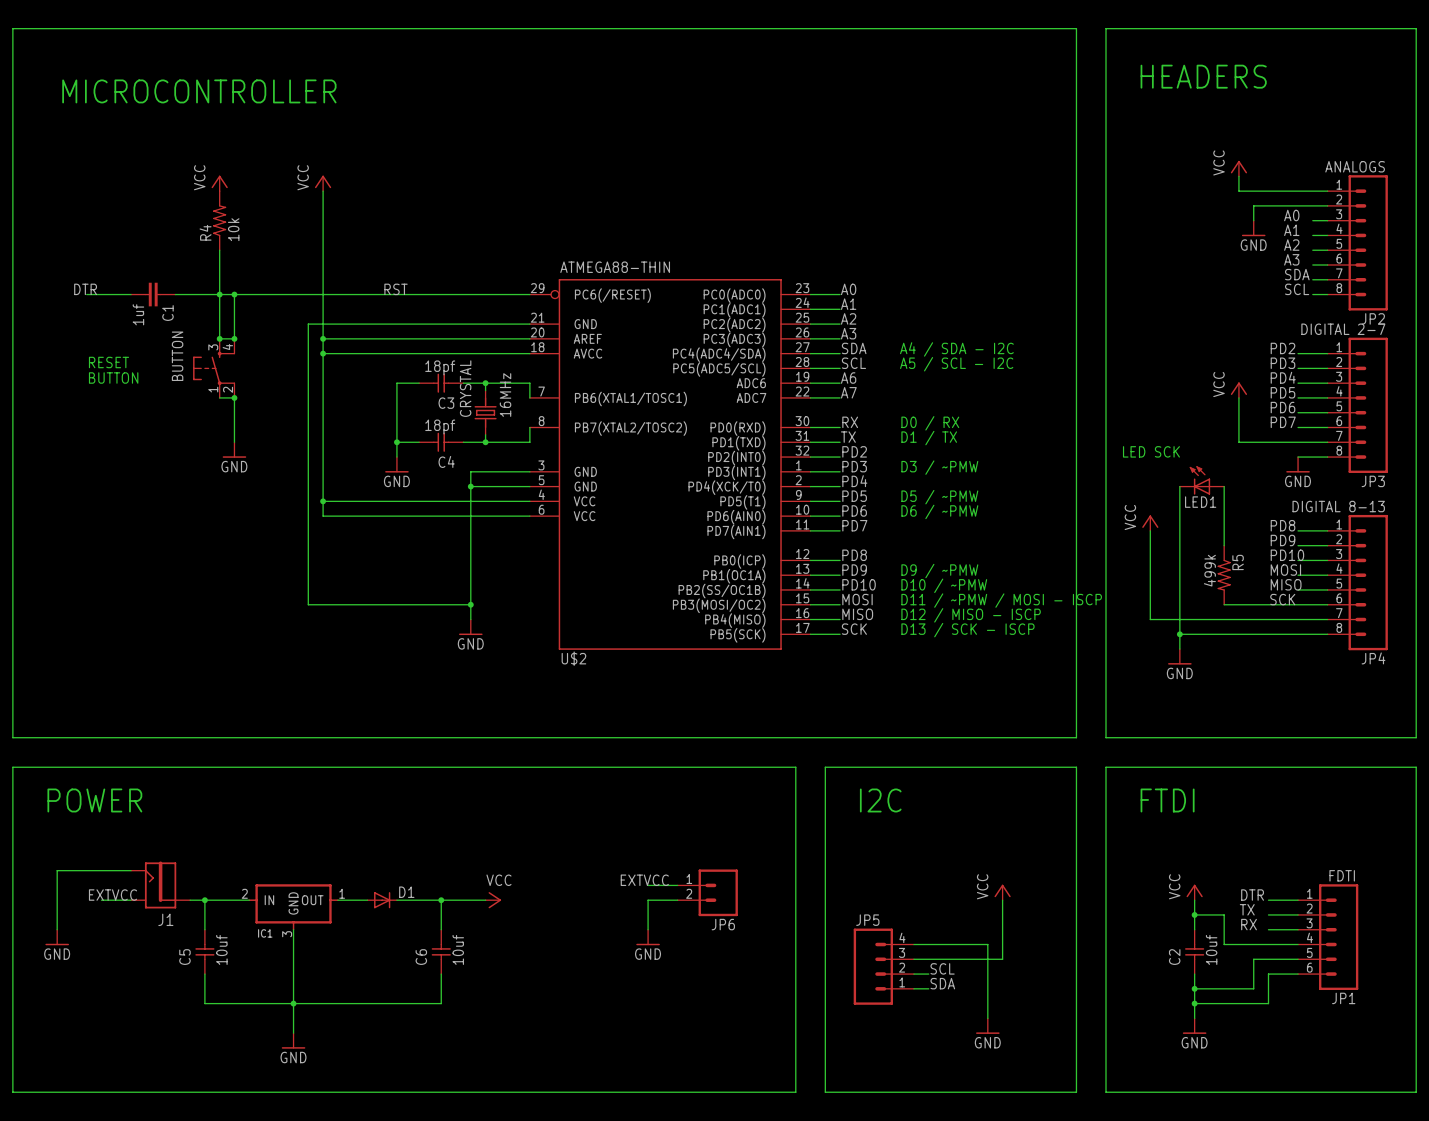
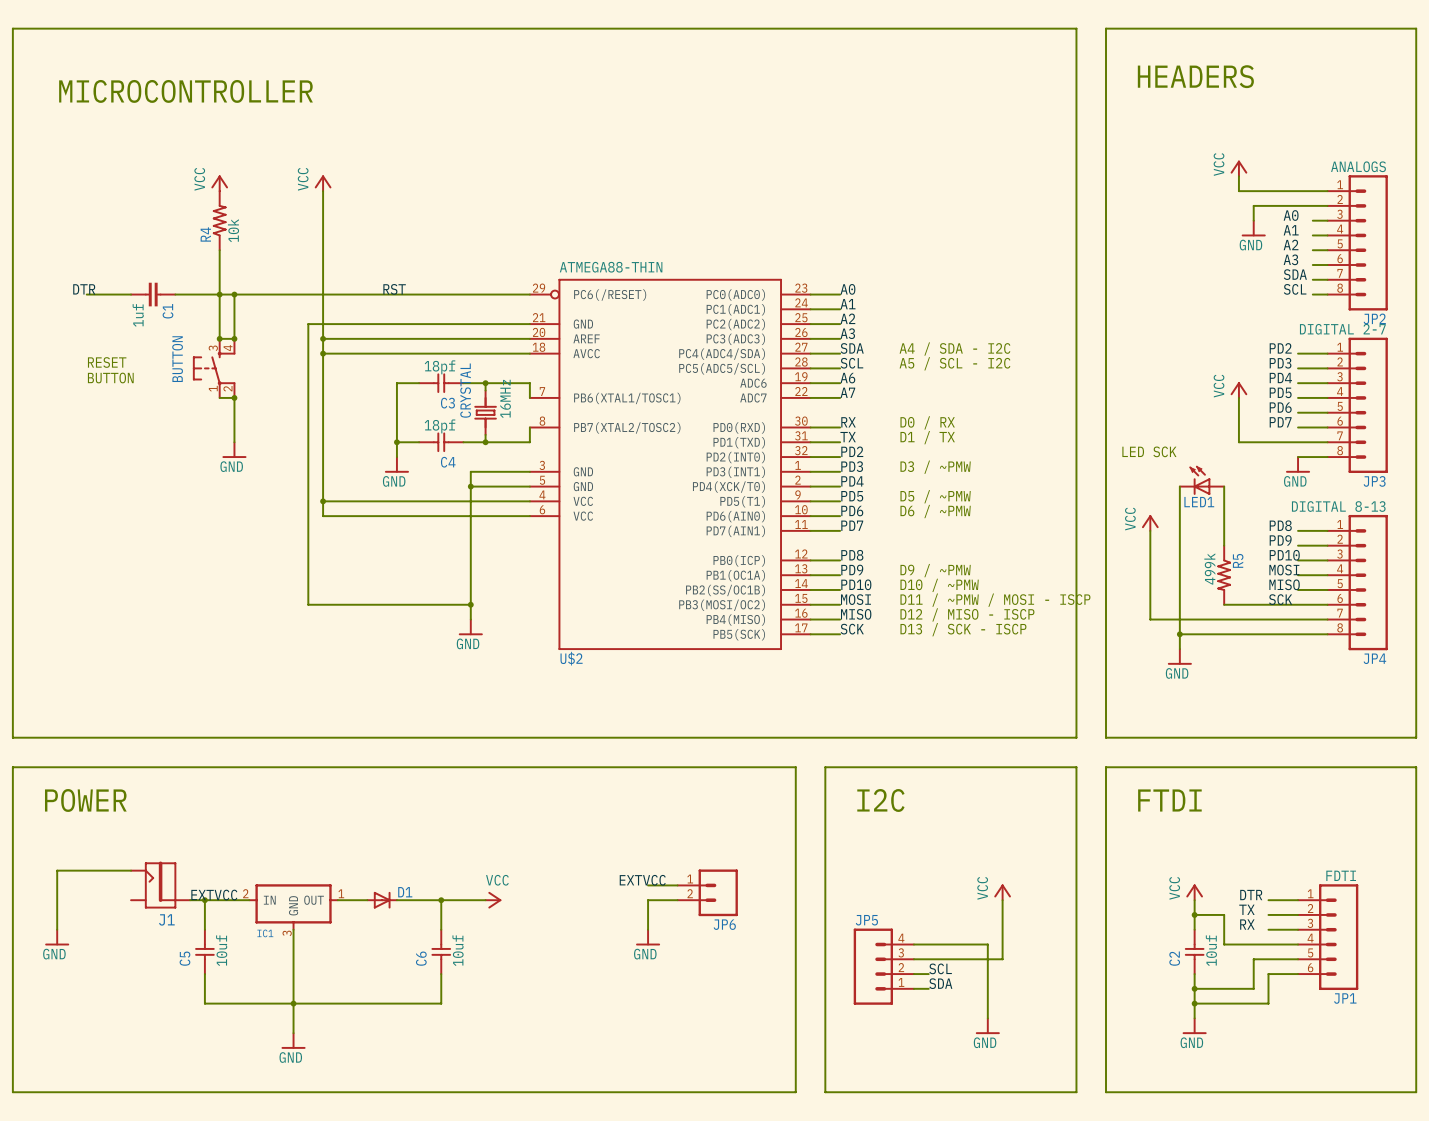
label position: EXTVCC (112, 895) -> EXTVCC (214, 895)
wire: (101, 900) (131, 900) -> none

